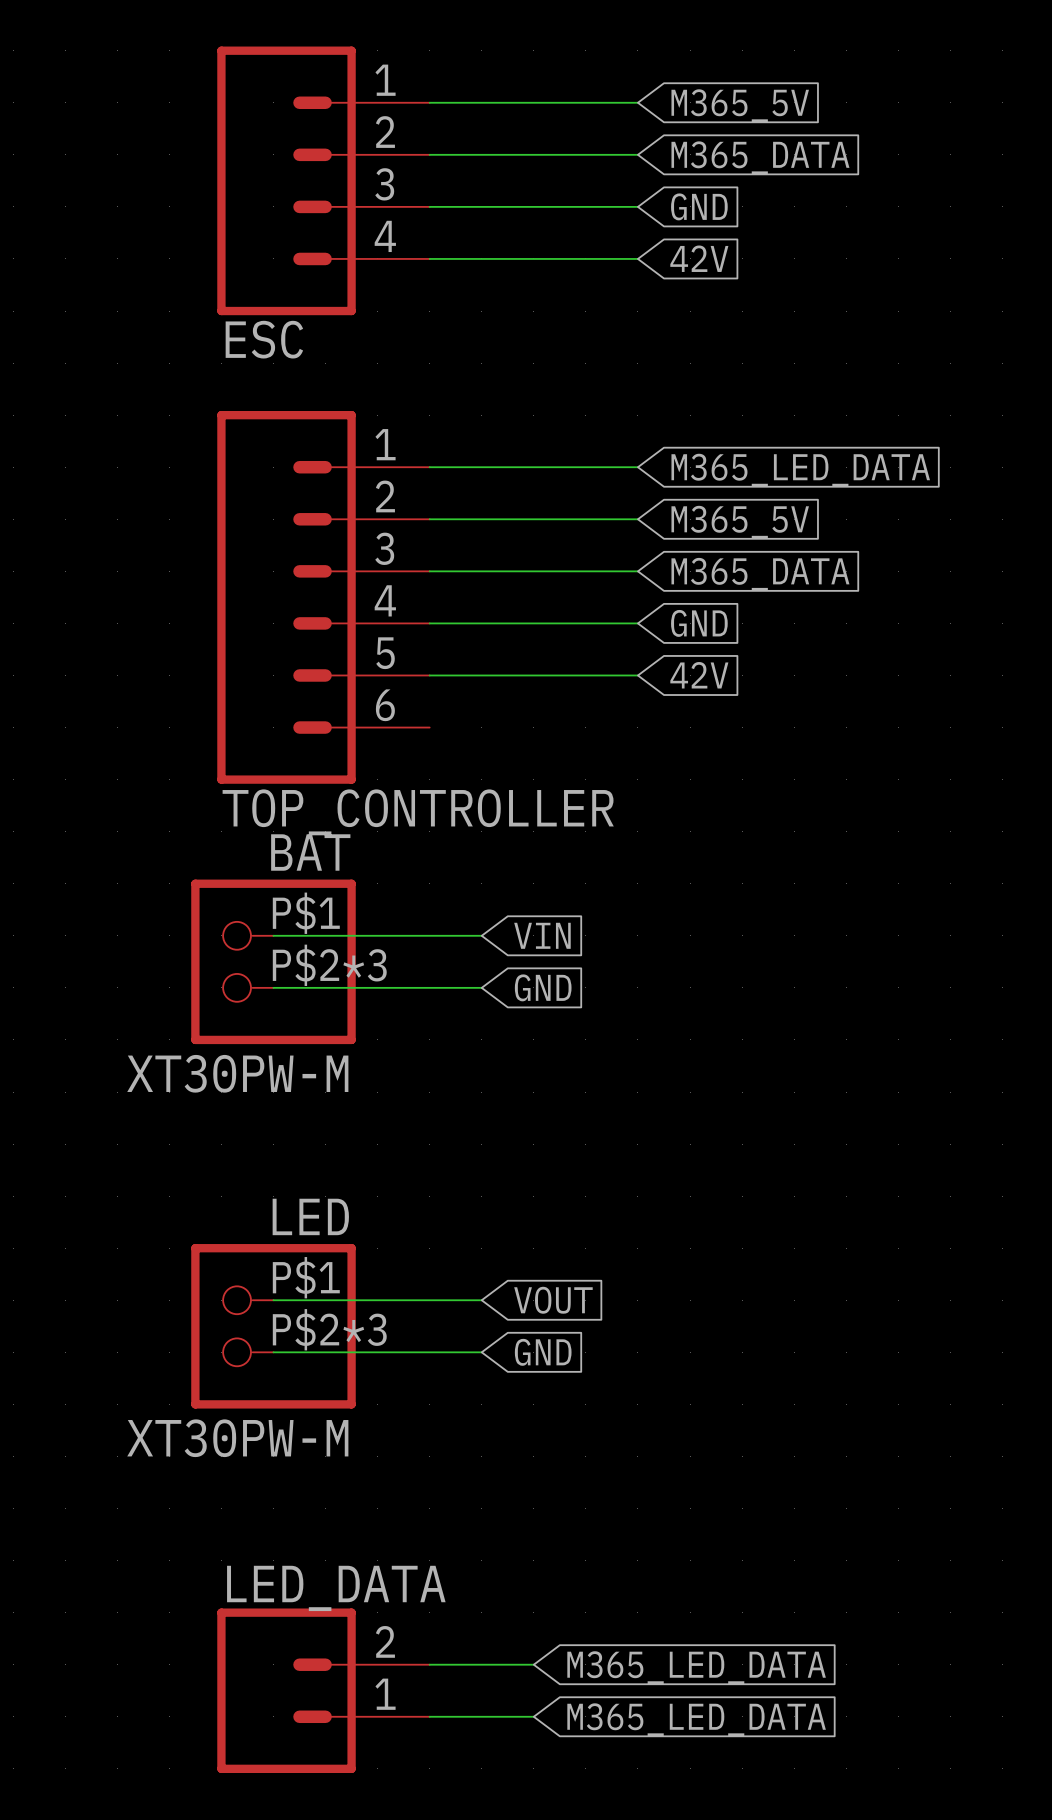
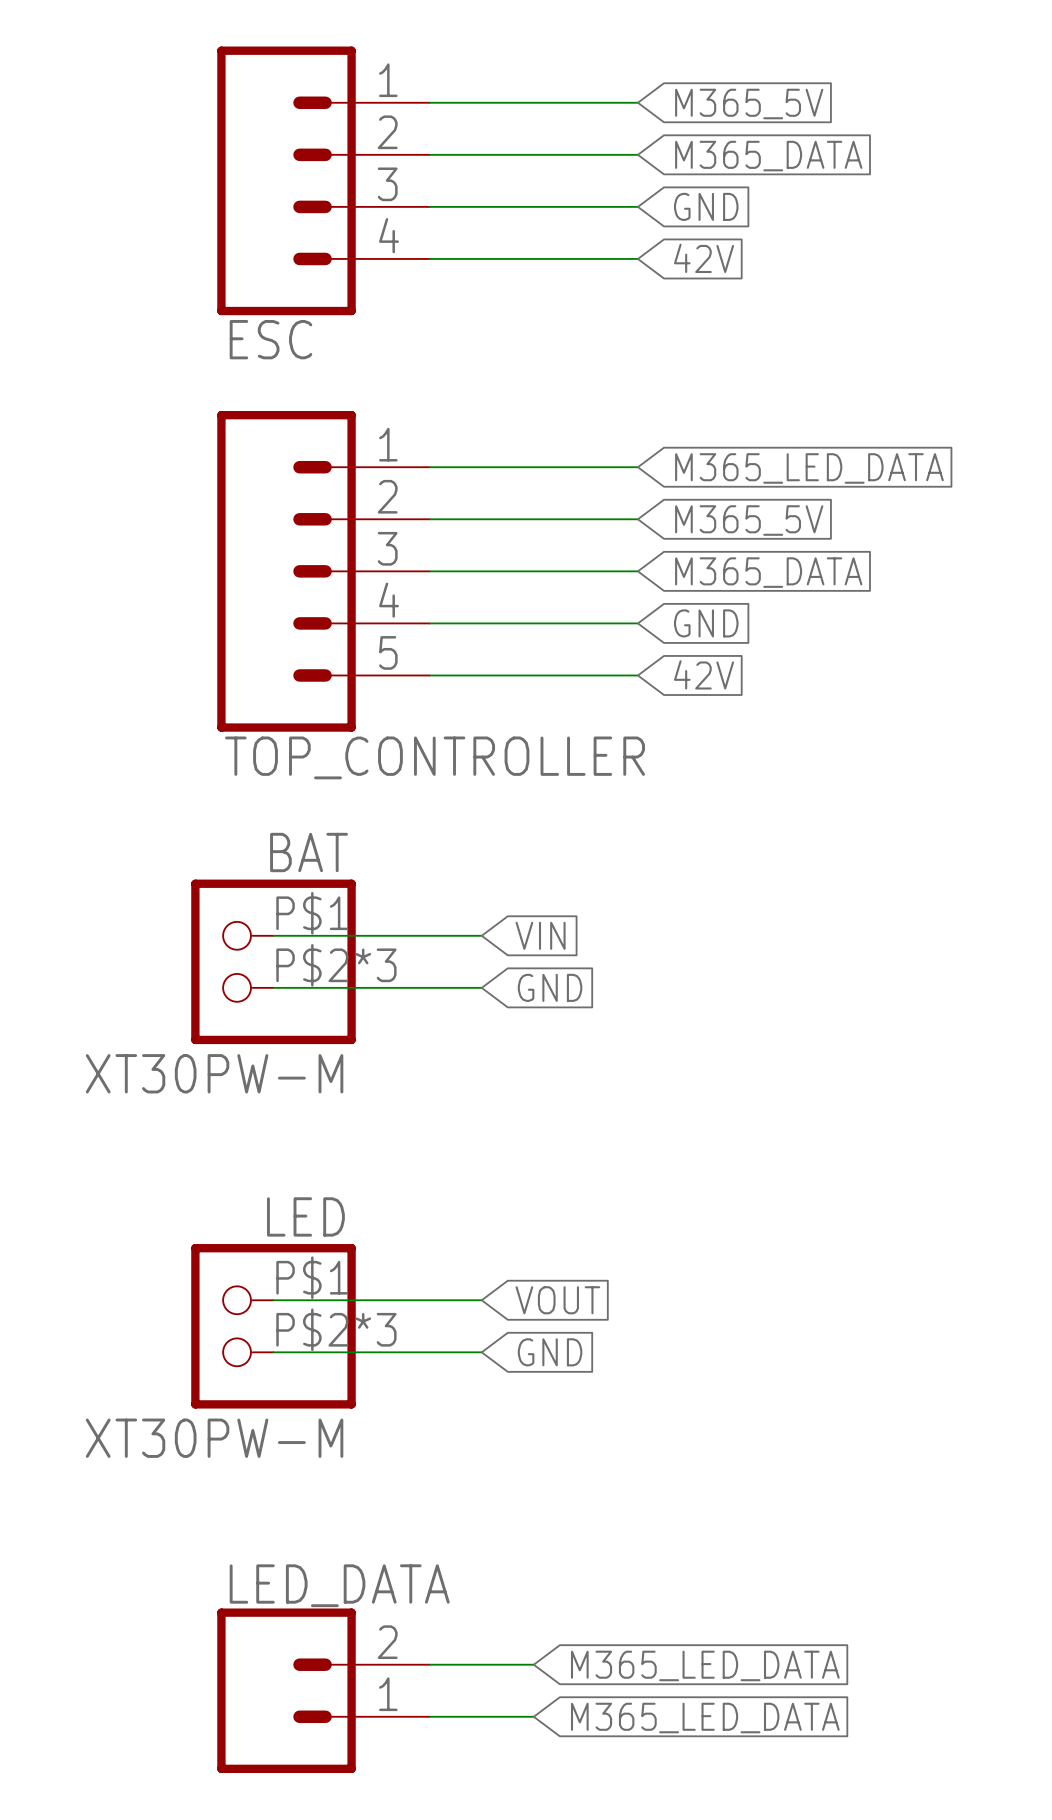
TOP_CONTROLLER: none -> (323, 571)
TOP_CONTROLLER: (323, 597) -> none

